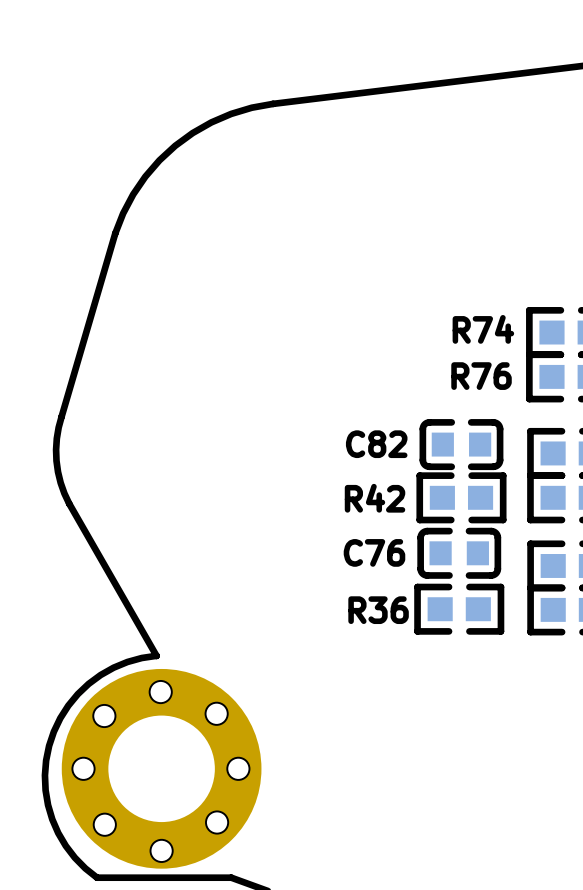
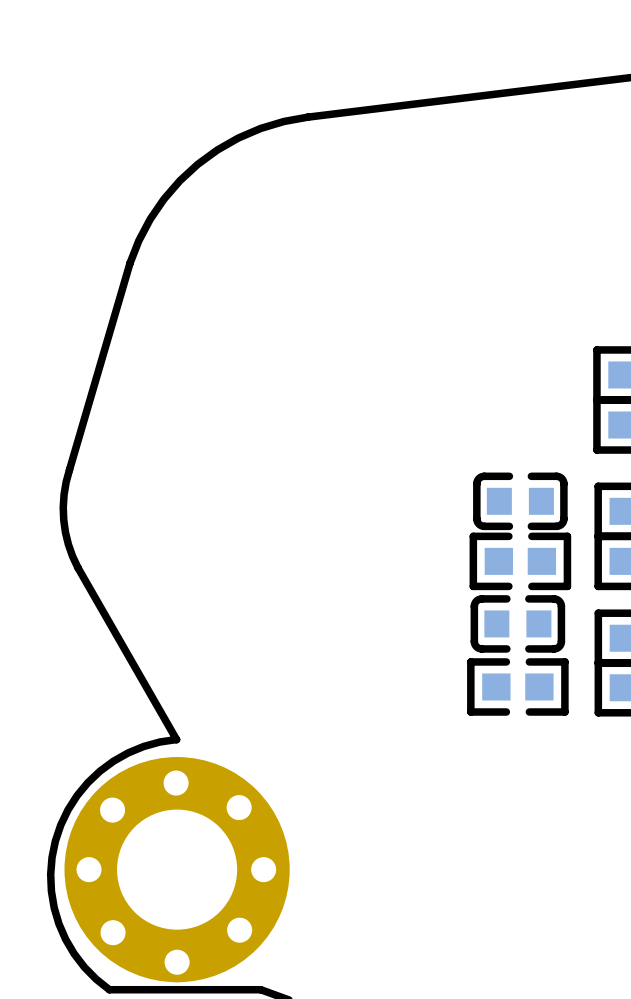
R74 name: R74 (483, 329) -> none
R76 name: R76 (481, 376) -> none
C82 name: C82 (376, 444) -> none
R42 name: R42 (375, 498) -> none
C76 name: C76 (374, 552) -> none
R36 name: R36 (378, 610) -> none
part footprint: [61, 668, 262, 869] -> [64, 757, 290, 983]

